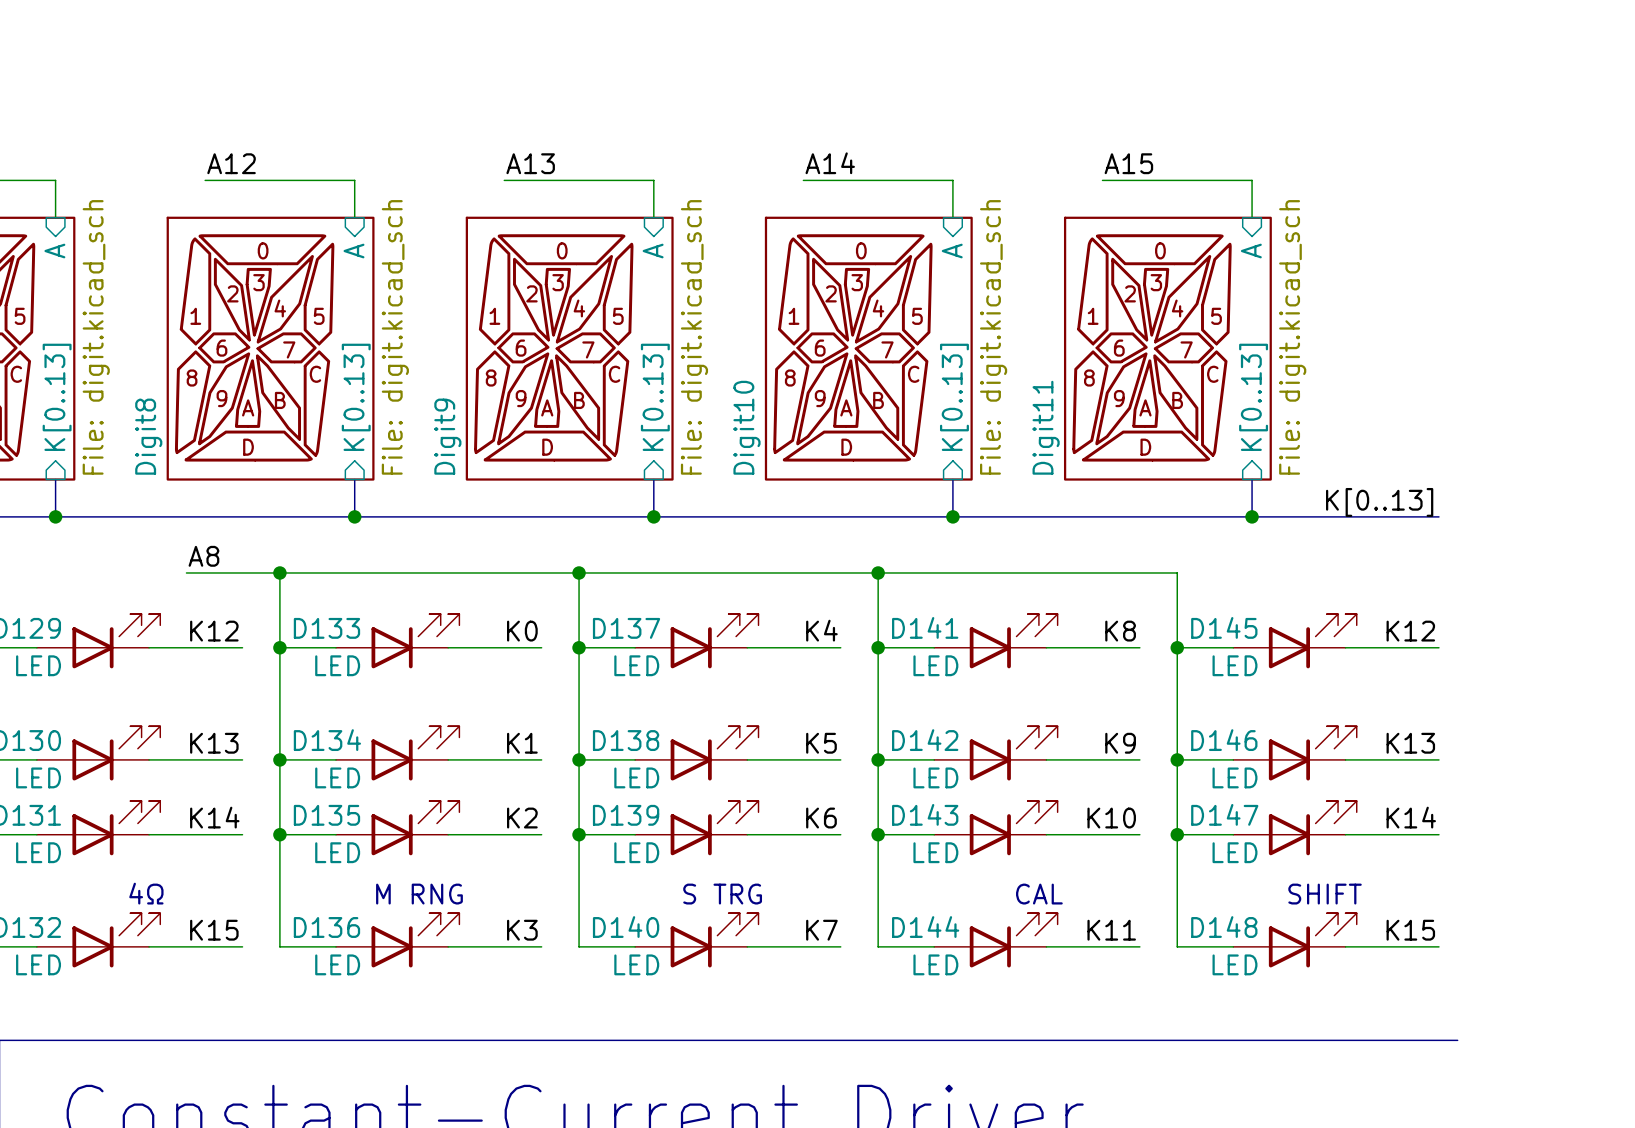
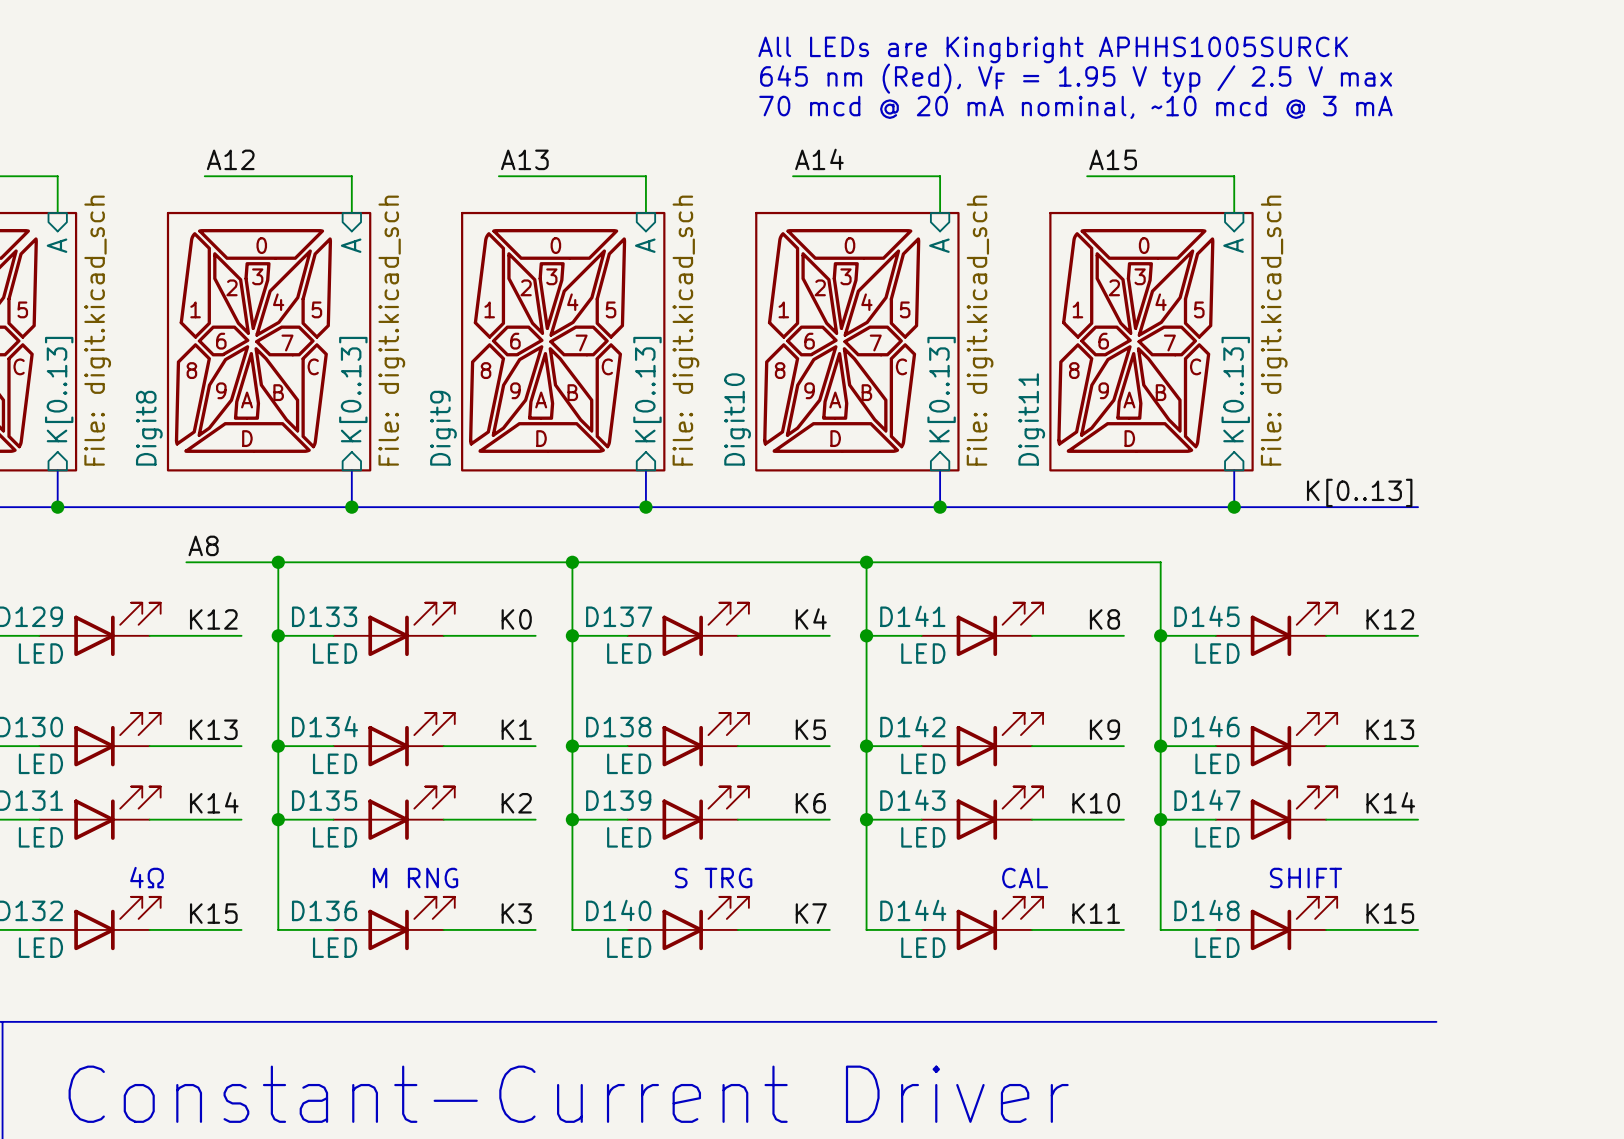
text: none -> All LEDs are Kingbright APHHS1005SURCK (1053, 49)
text: none -> 645 nm (Red), VF = 1.95 V typ / 2.5 V max (1076, 78)
text: none -> 70 mcd @ 20 mA nominal, ~10 mcd @ 3 mA (1075, 107)

